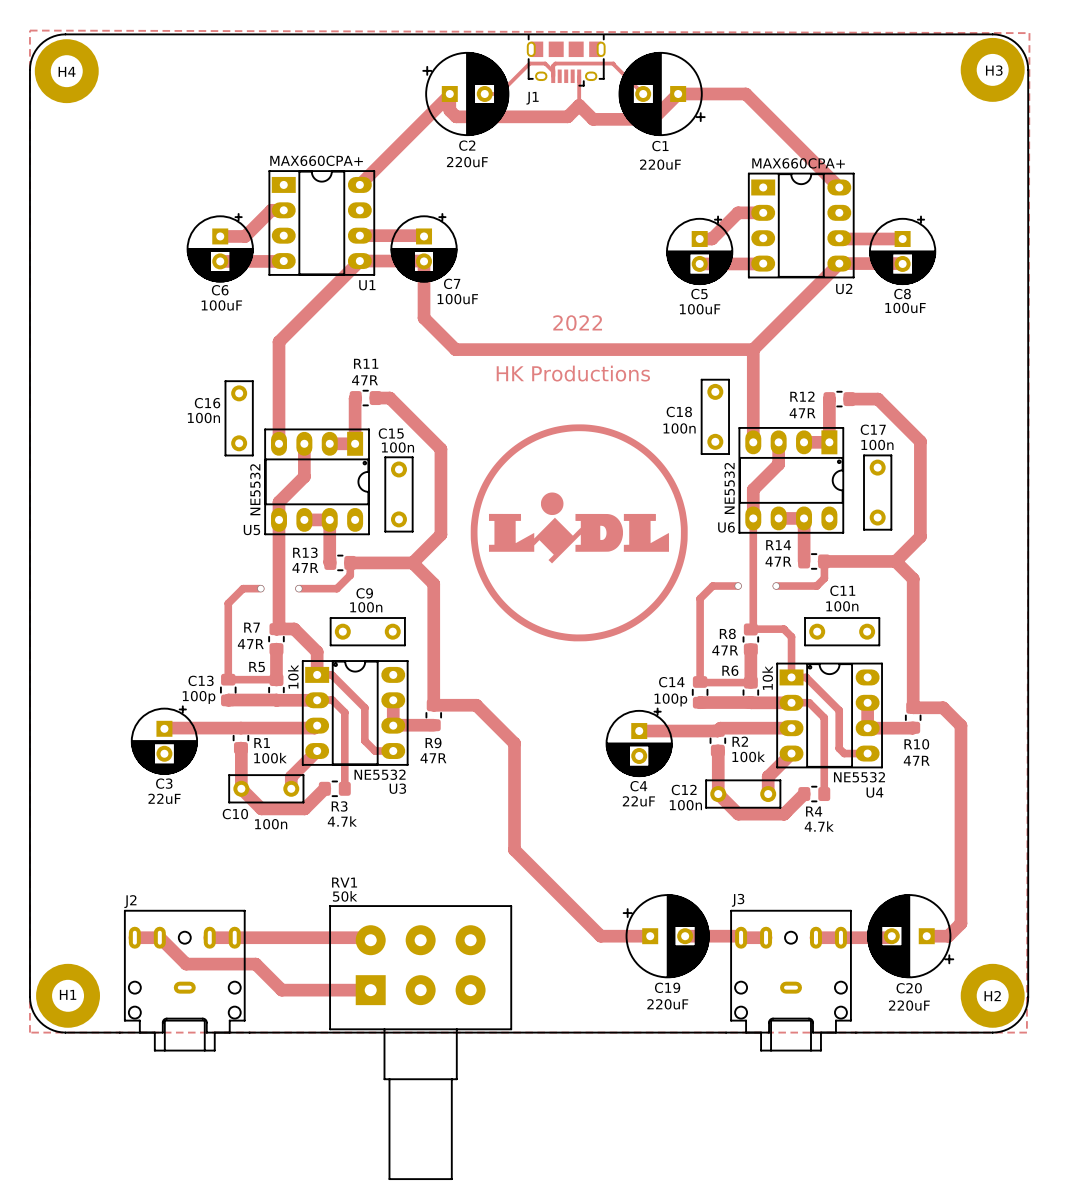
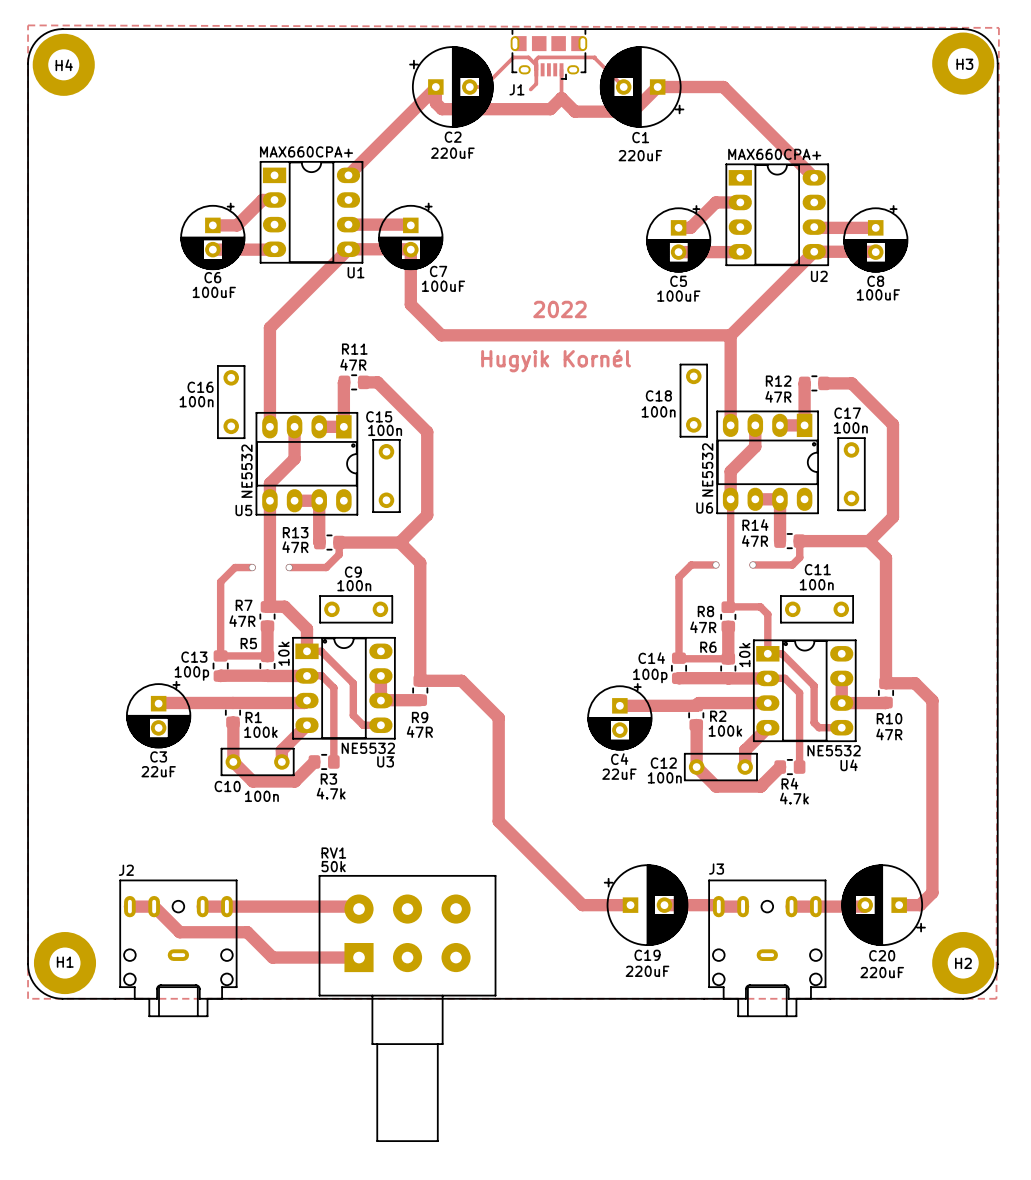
track: none -> (536, 69) (536, 83) (530, 89)
text: HK Productions (573, 373) -> Hugyik Kornél (556, 360)
drawing: [470, 424, 688, 642] -> none

